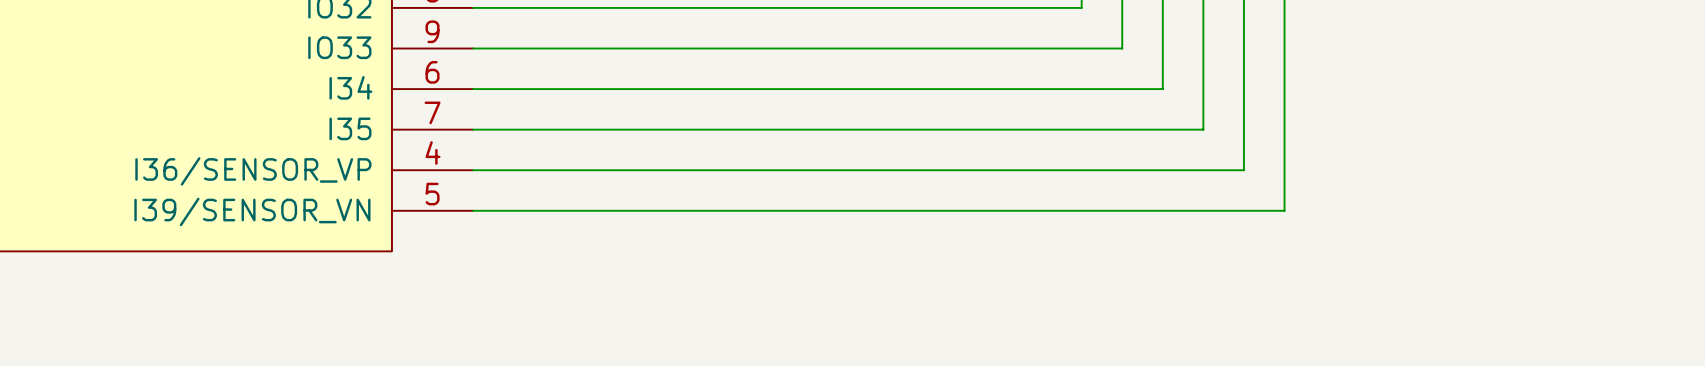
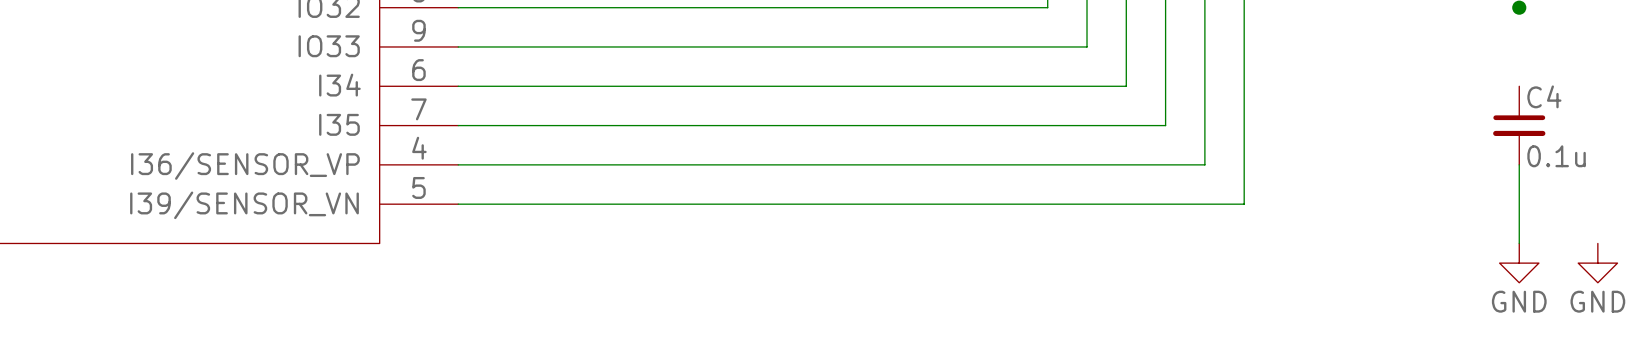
junction: none -> (1519, 7)
C4: none -> 0.1u (1519, 125)
wire: none -> (1519, 164) (1519, 243)
power symbol: none -> GND (1519, 263)
power symbol: none -> GND (1597, 263)

